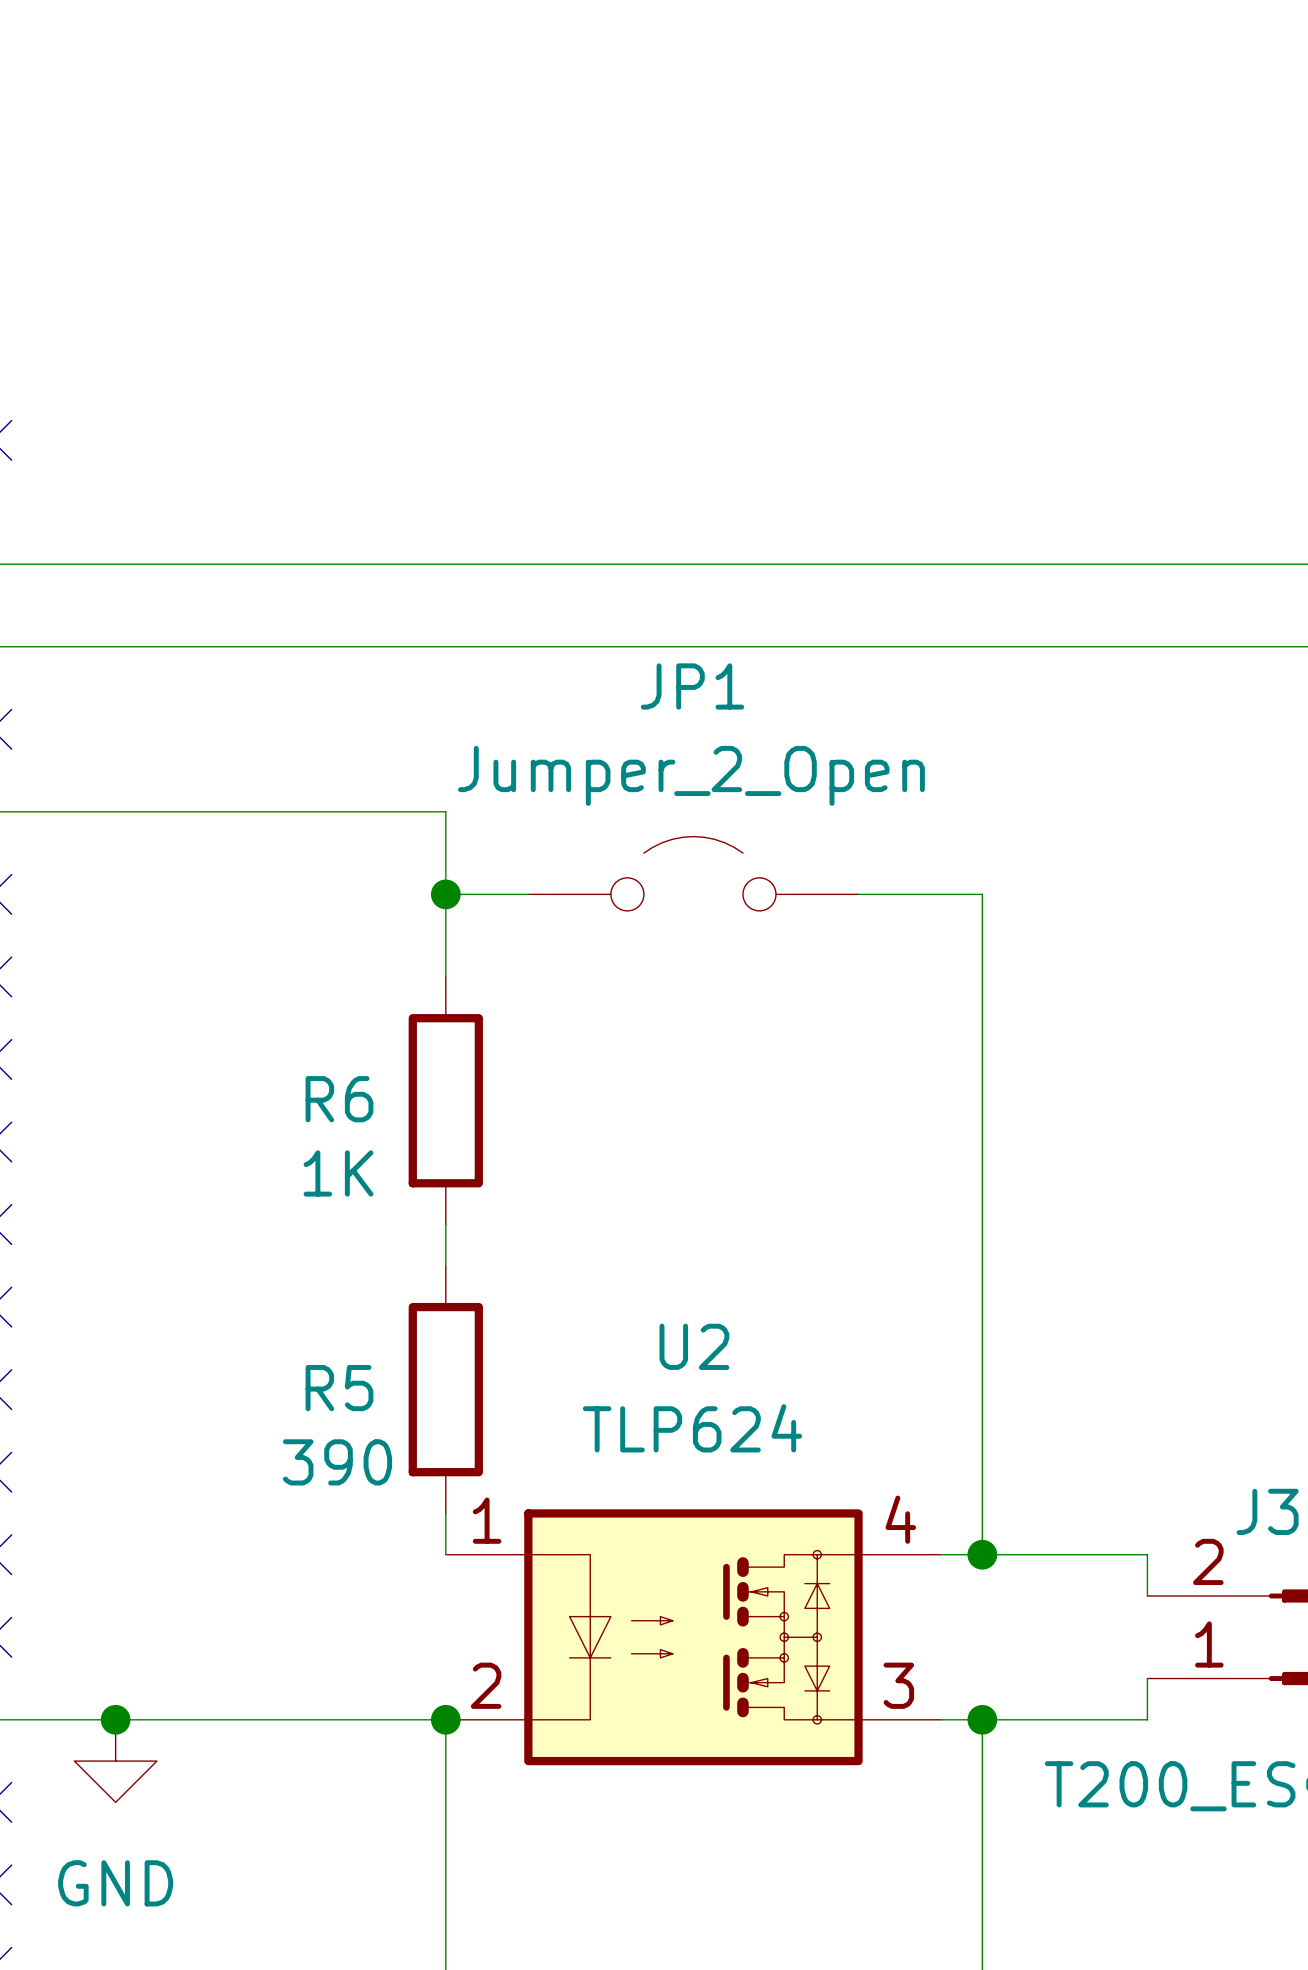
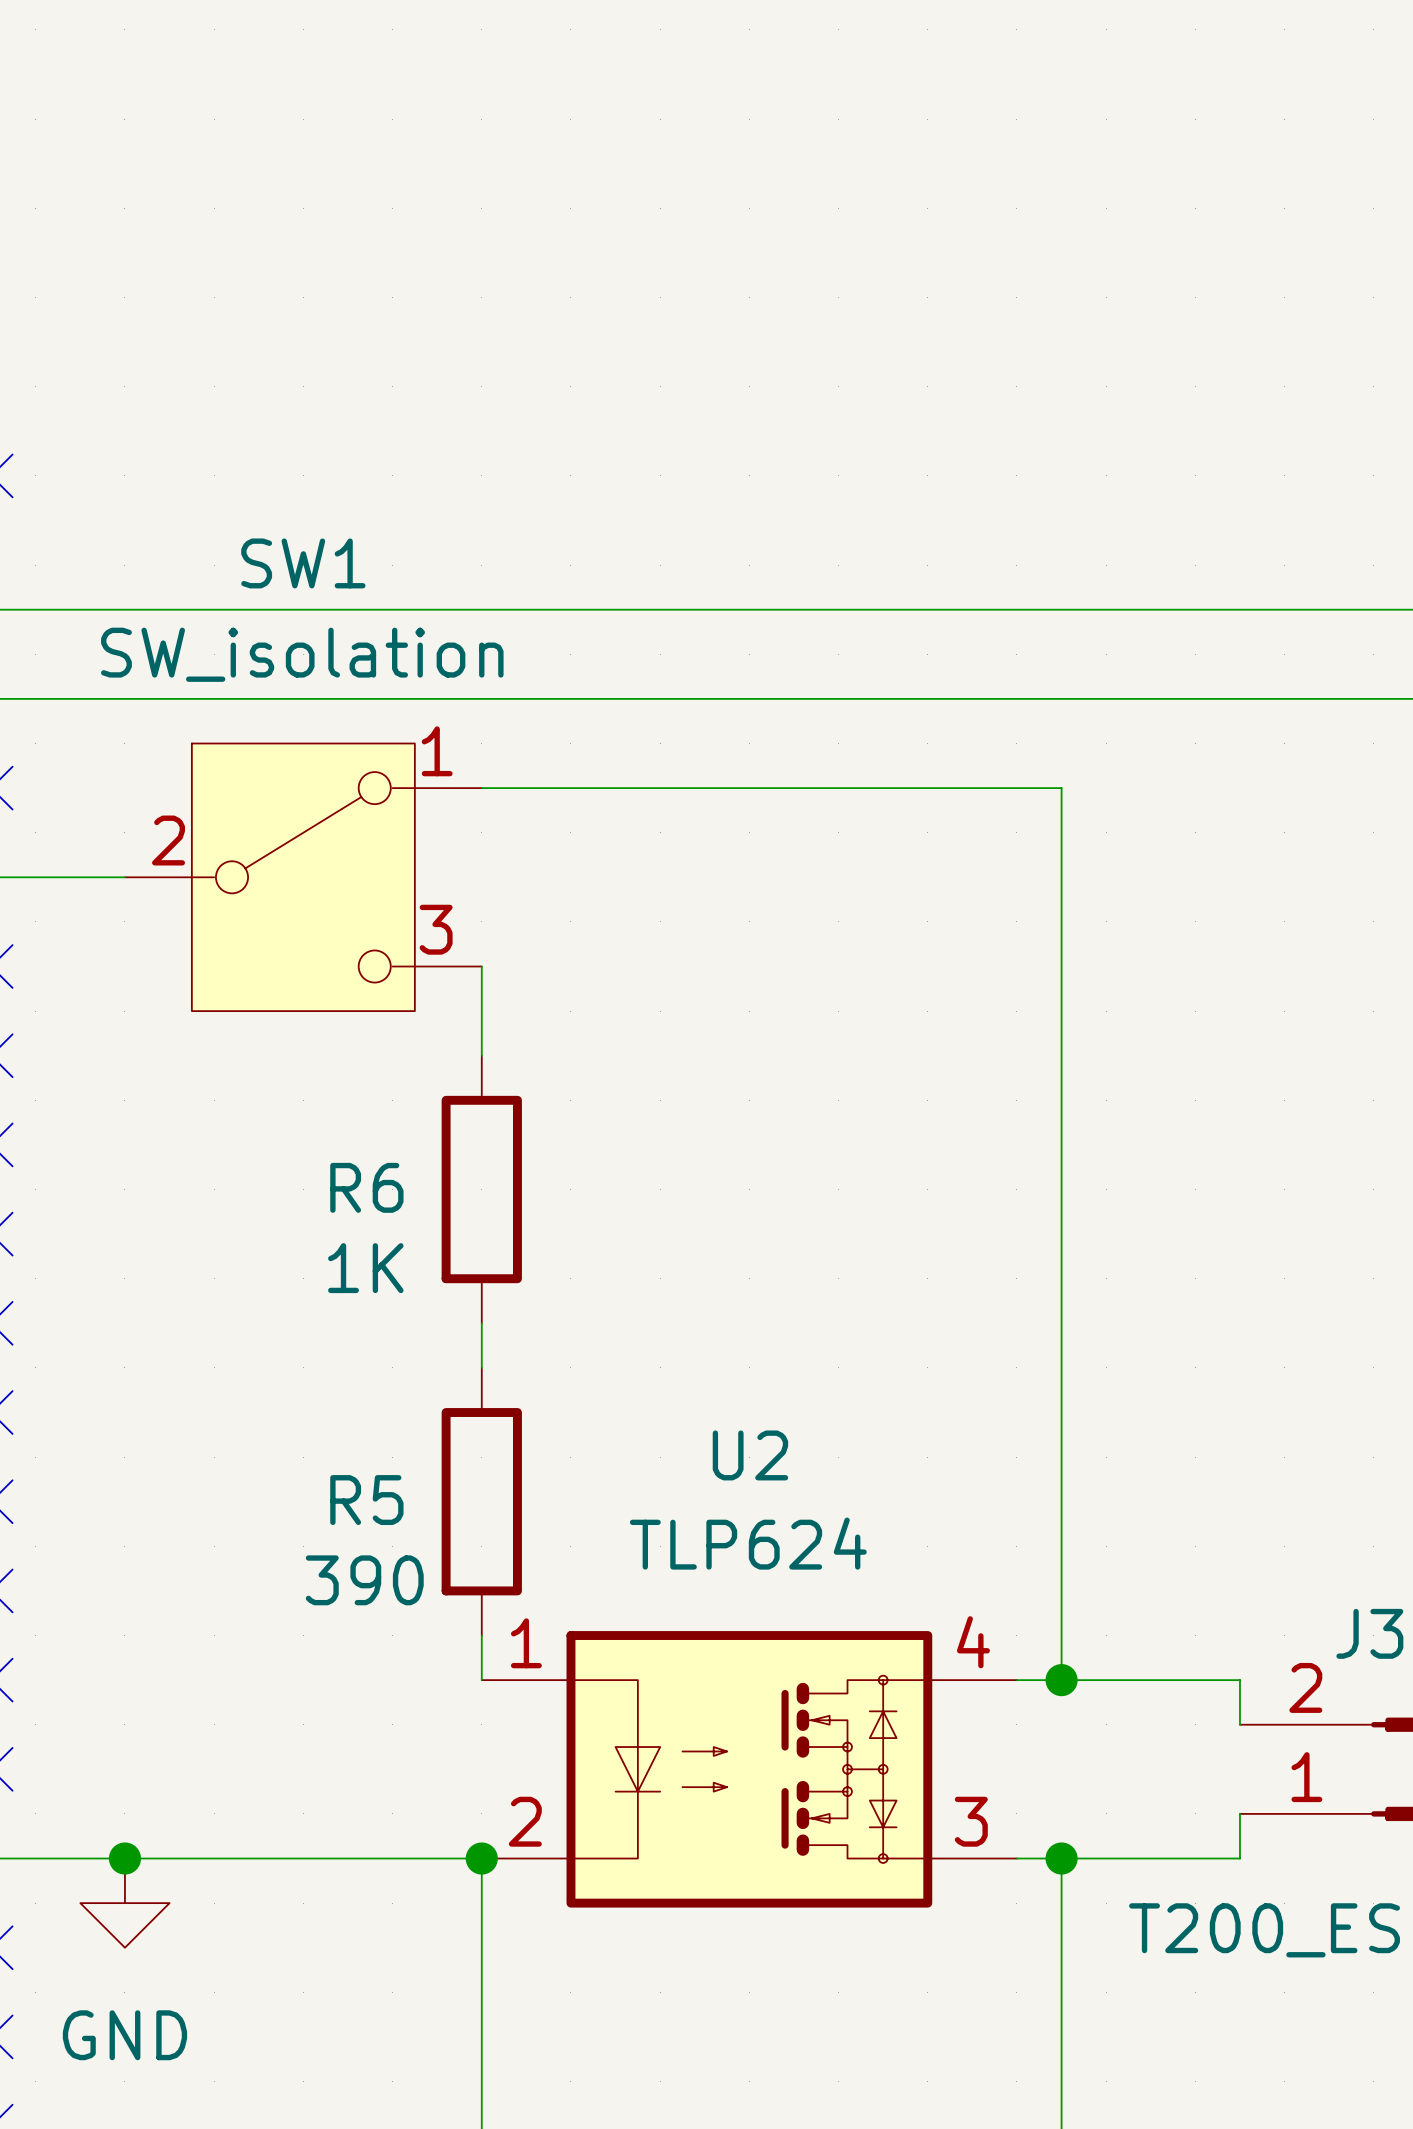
wire: (115, 811) (445, 811) (445, 894) (528, 894) -> none
SW1: none -> SW_isolation (303, 877)
JP1: Jumper_2_Open (693, 873) -> none
junction: (445, 894) -> none
wire: (858, 894) (982, 894) -> (481, 788) (1061, 788) (1061, 966)

